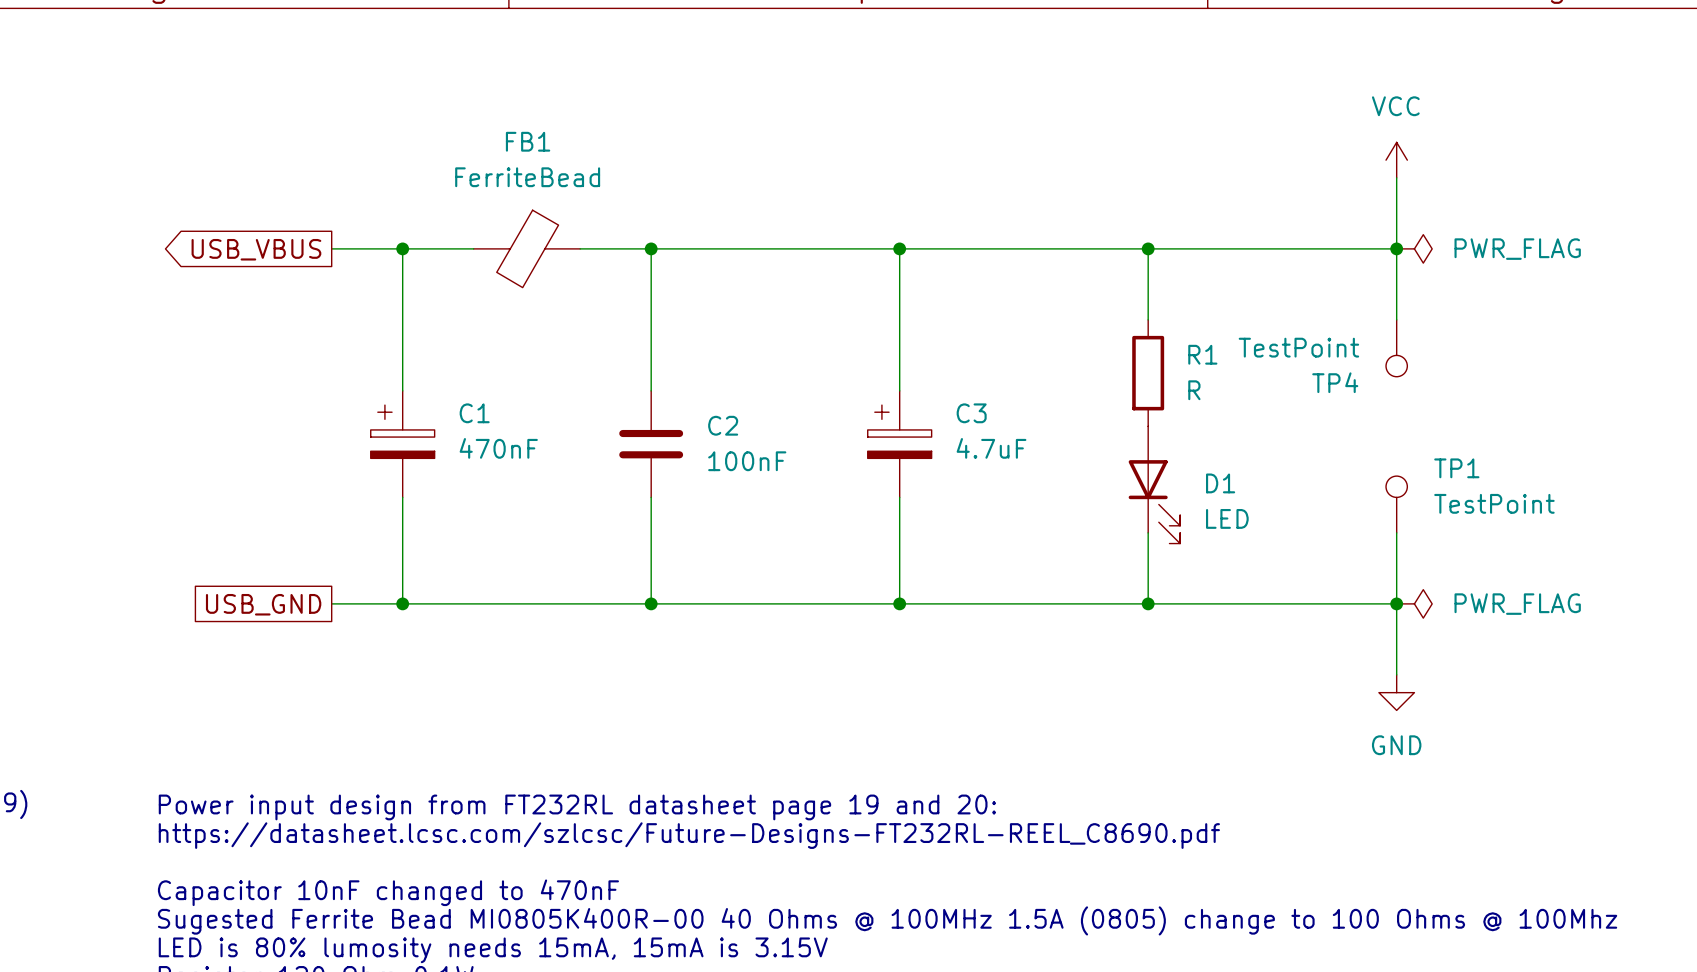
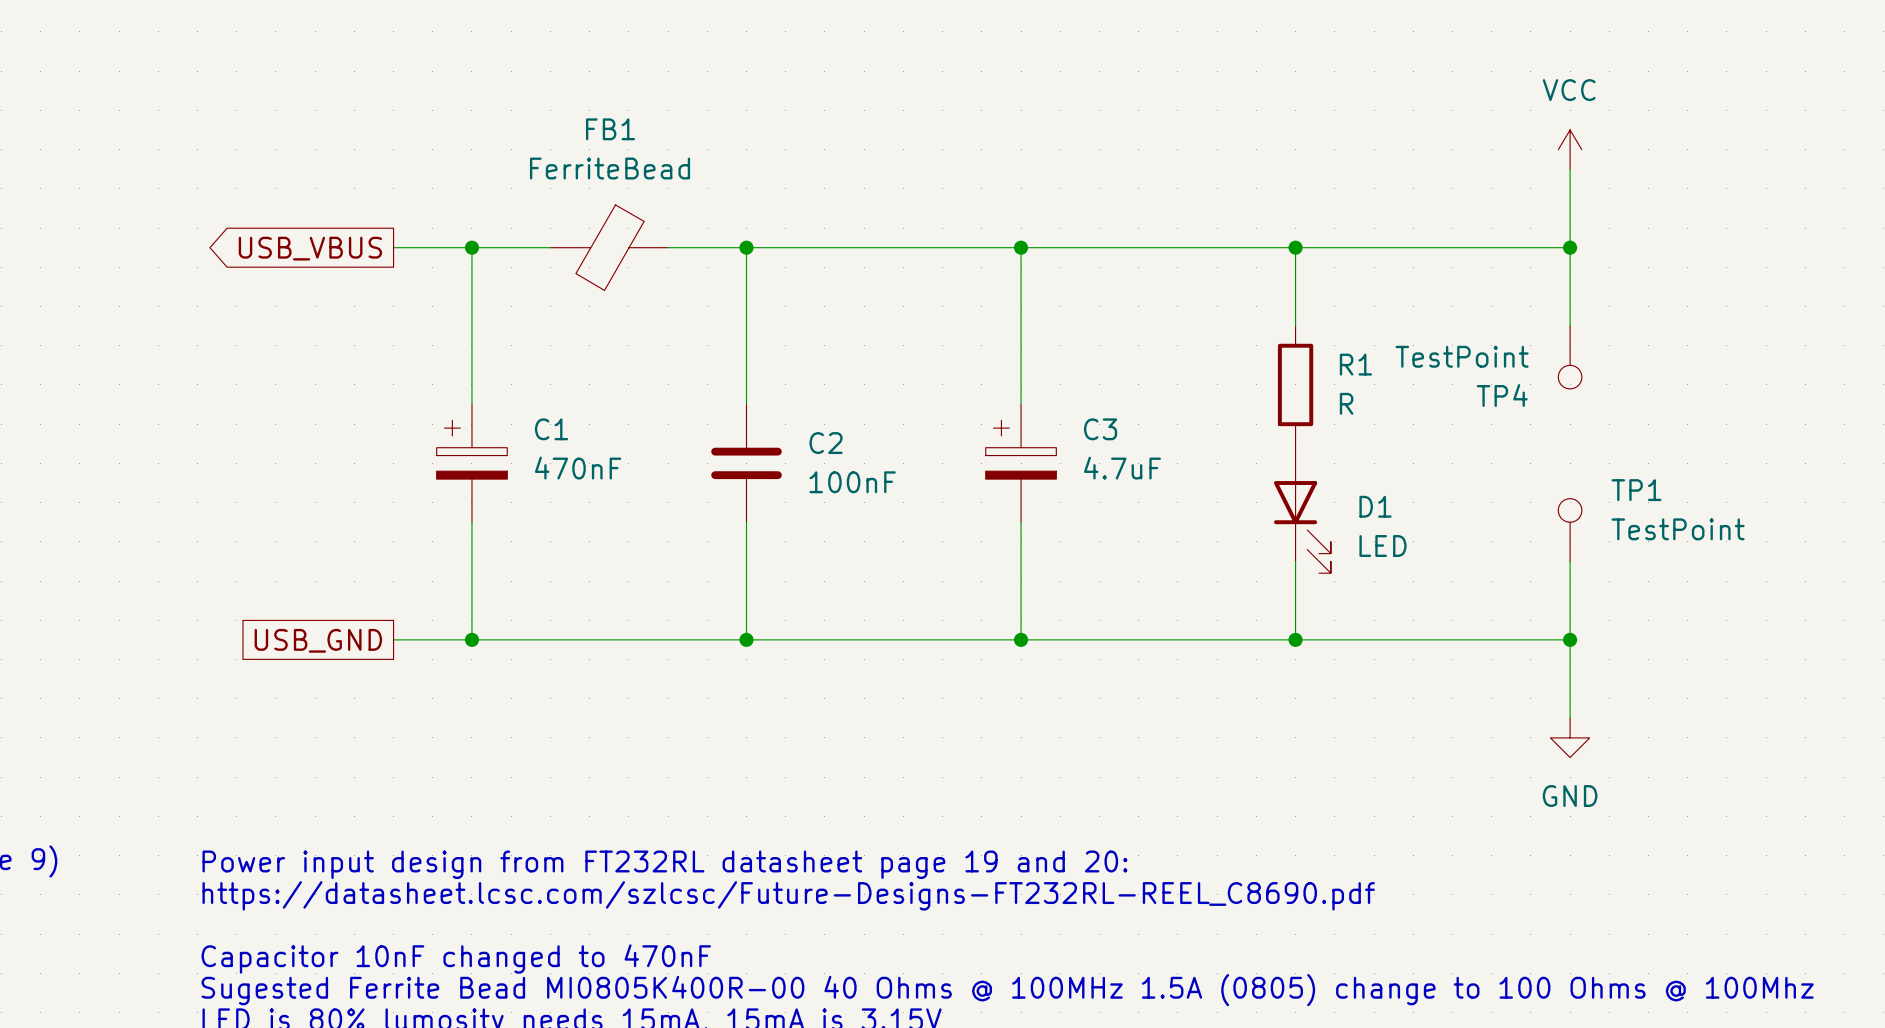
power symbol: PWR_FLAG (1414, 248) -> none
power symbol: PWR_FLAG (1414, 603) -> none

